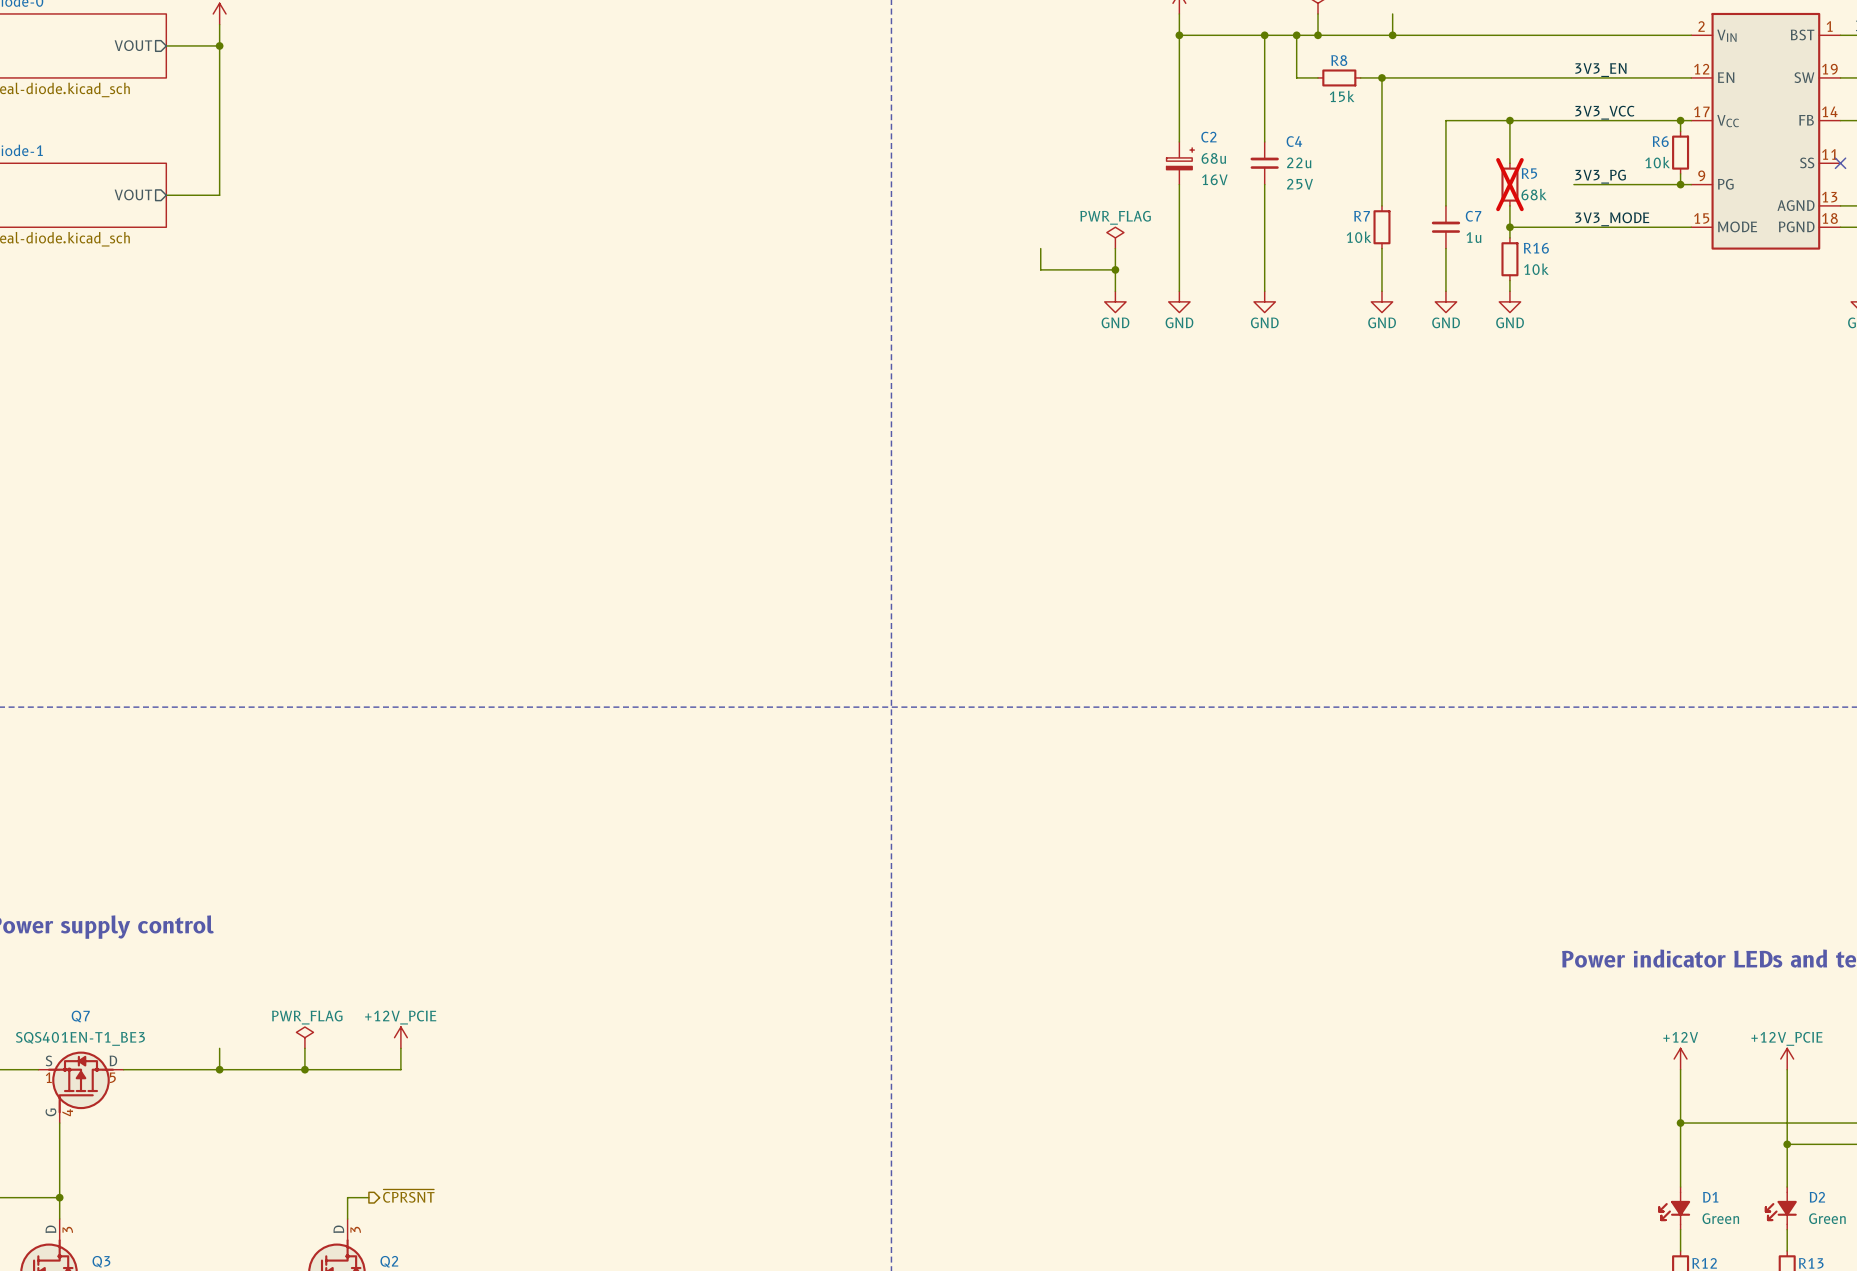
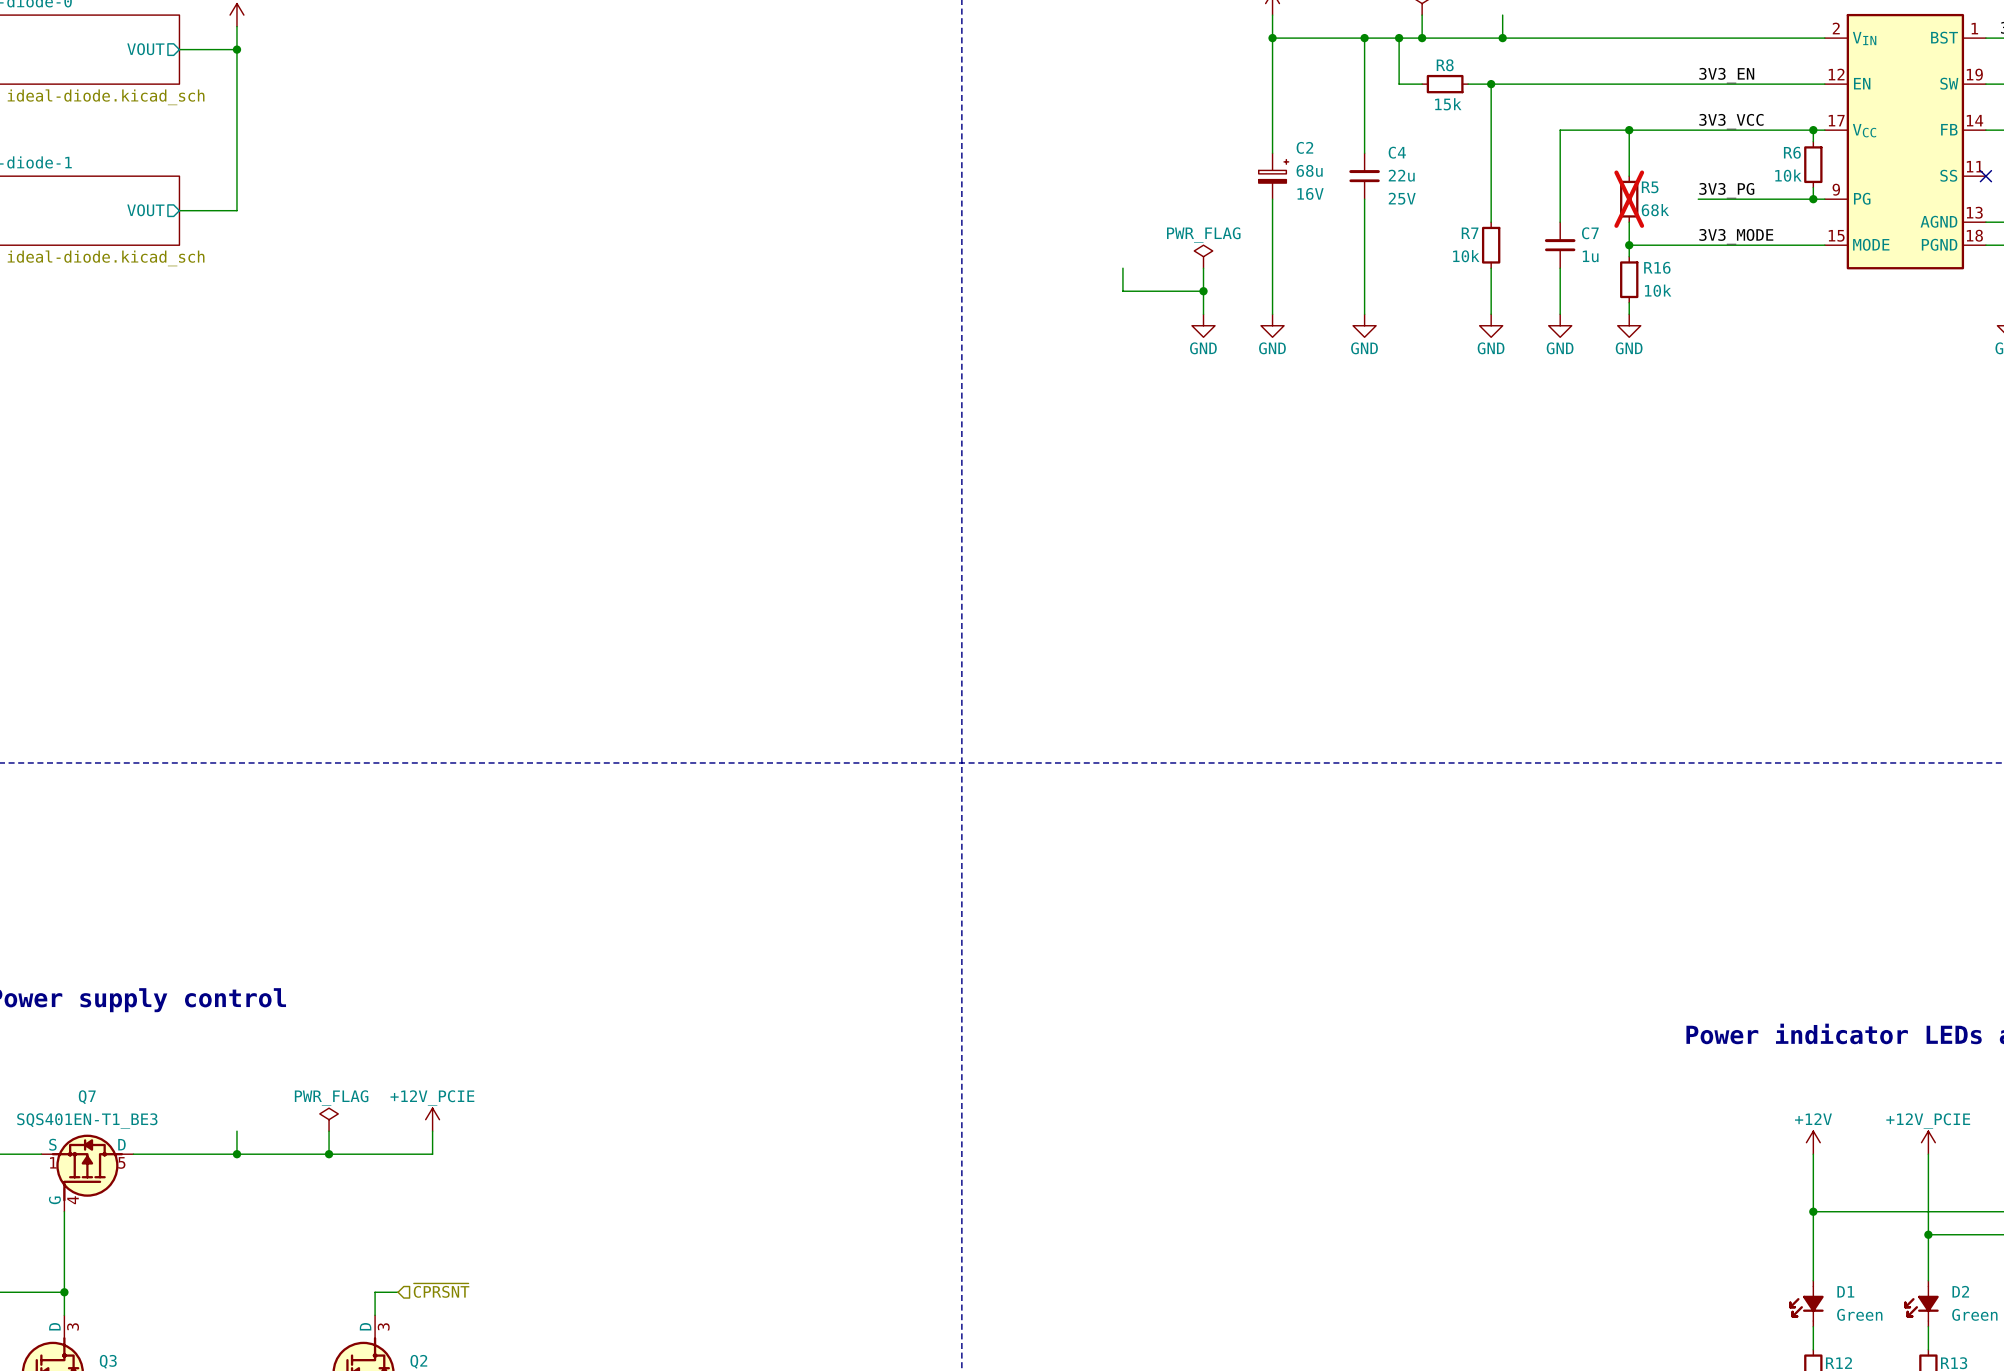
hierarchical label shape: output (408, 1196) -> input (441, 1290)

